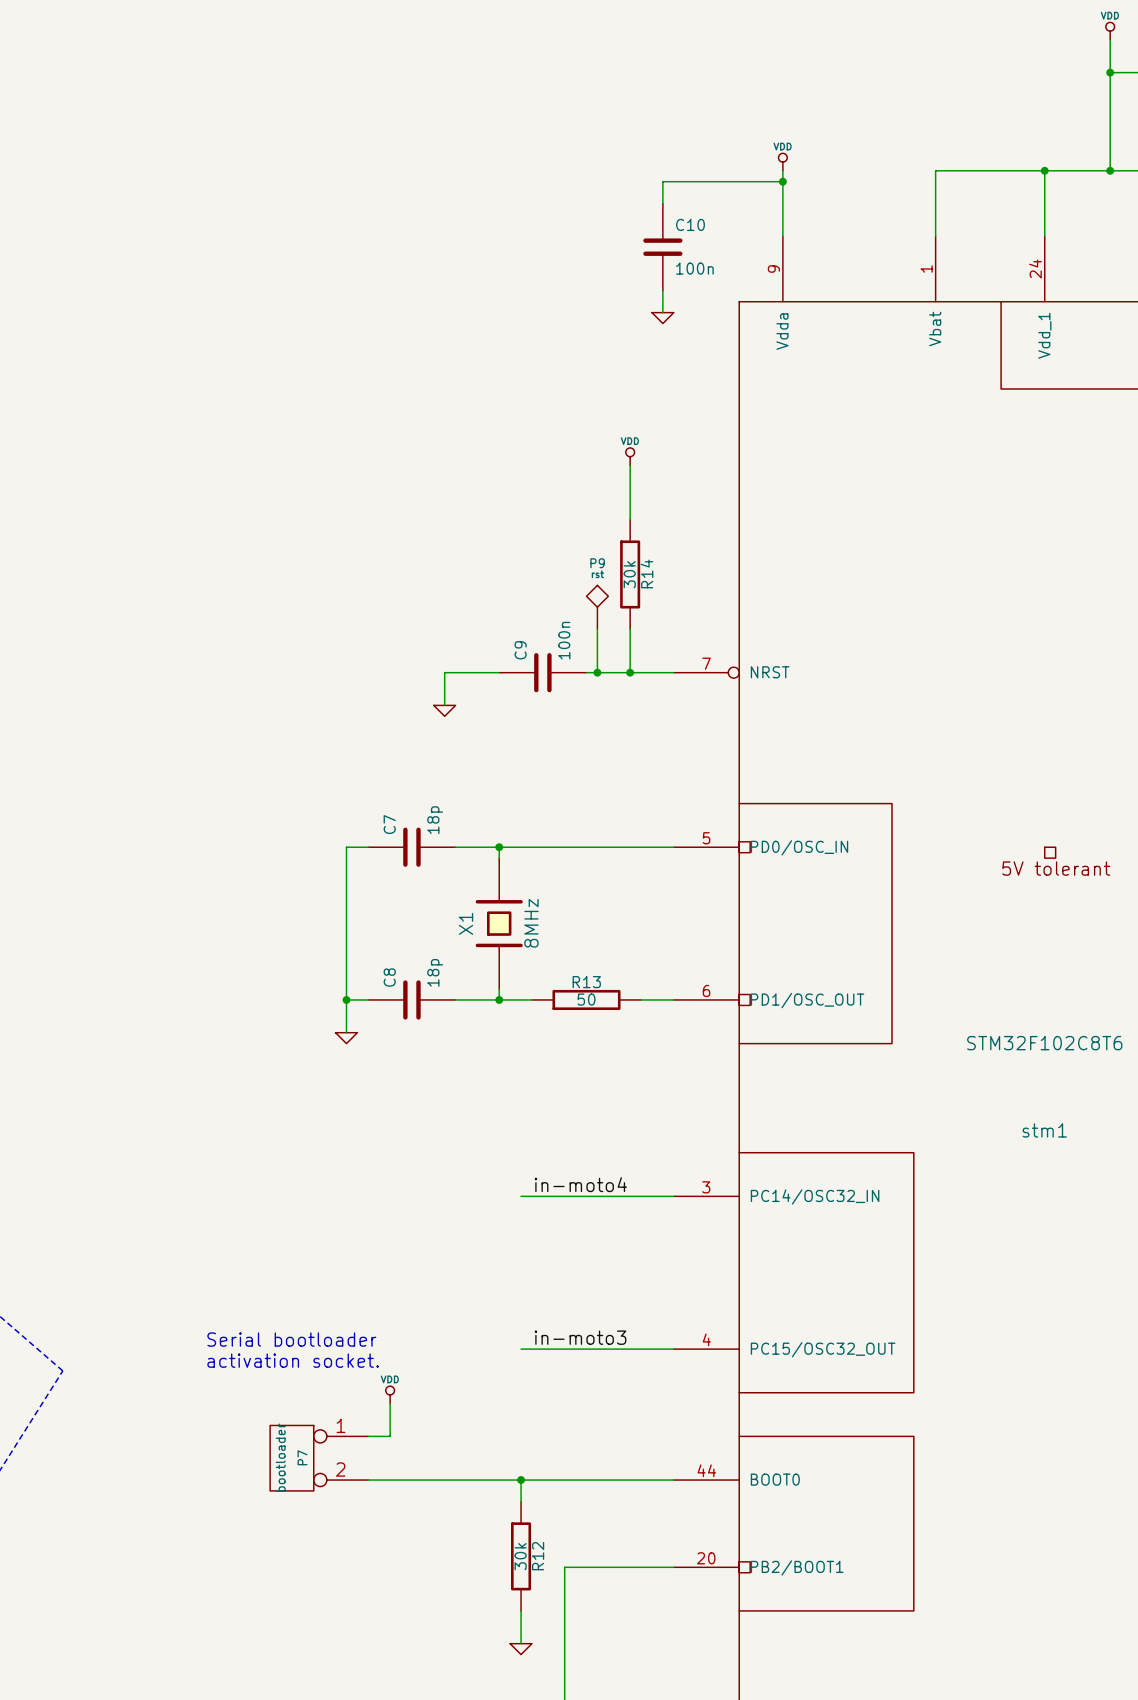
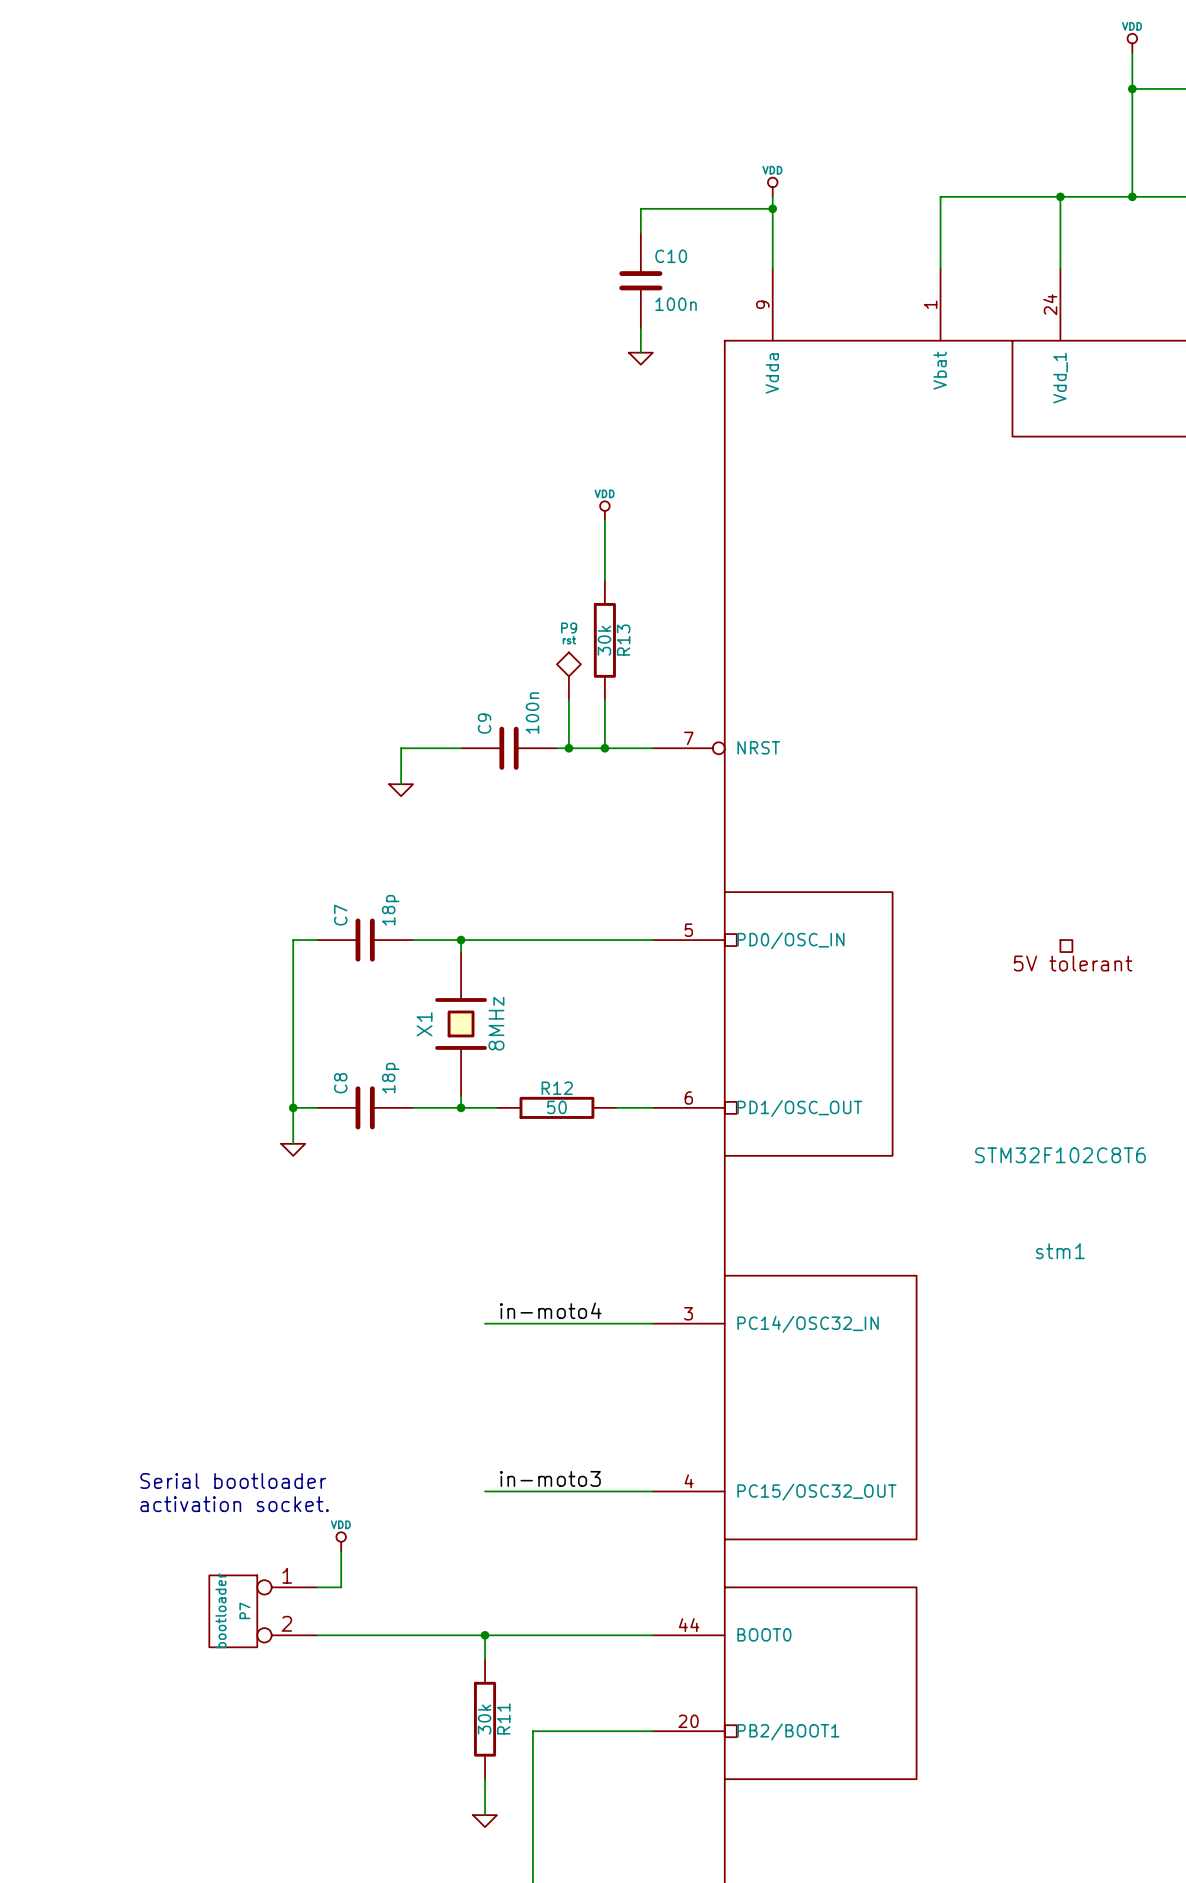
R14 name: R14 (646, 573) -> R13 (623, 640)
R13 name: R13 (586, 982) -> R12 (557, 1088)
R12 name: R12 (538, 1556) -> R11 (503, 1718)

